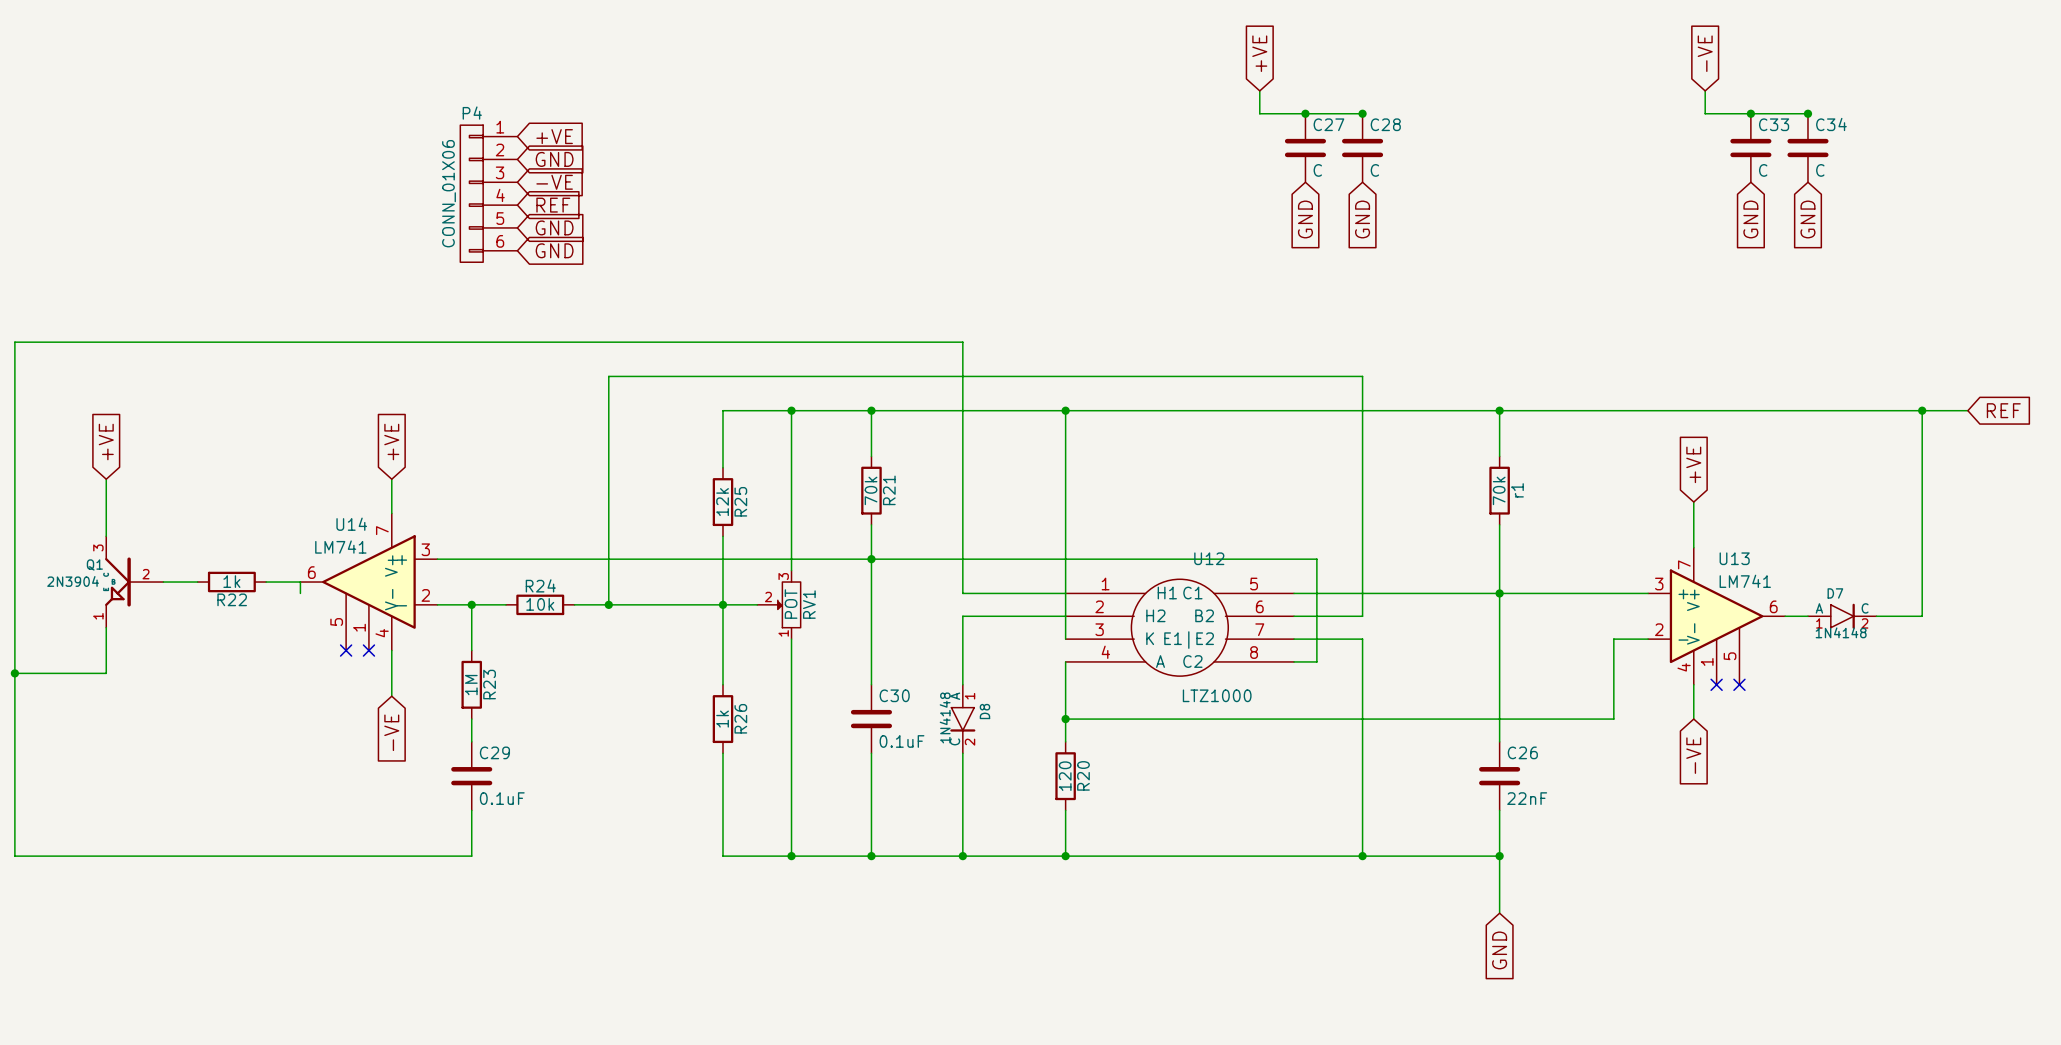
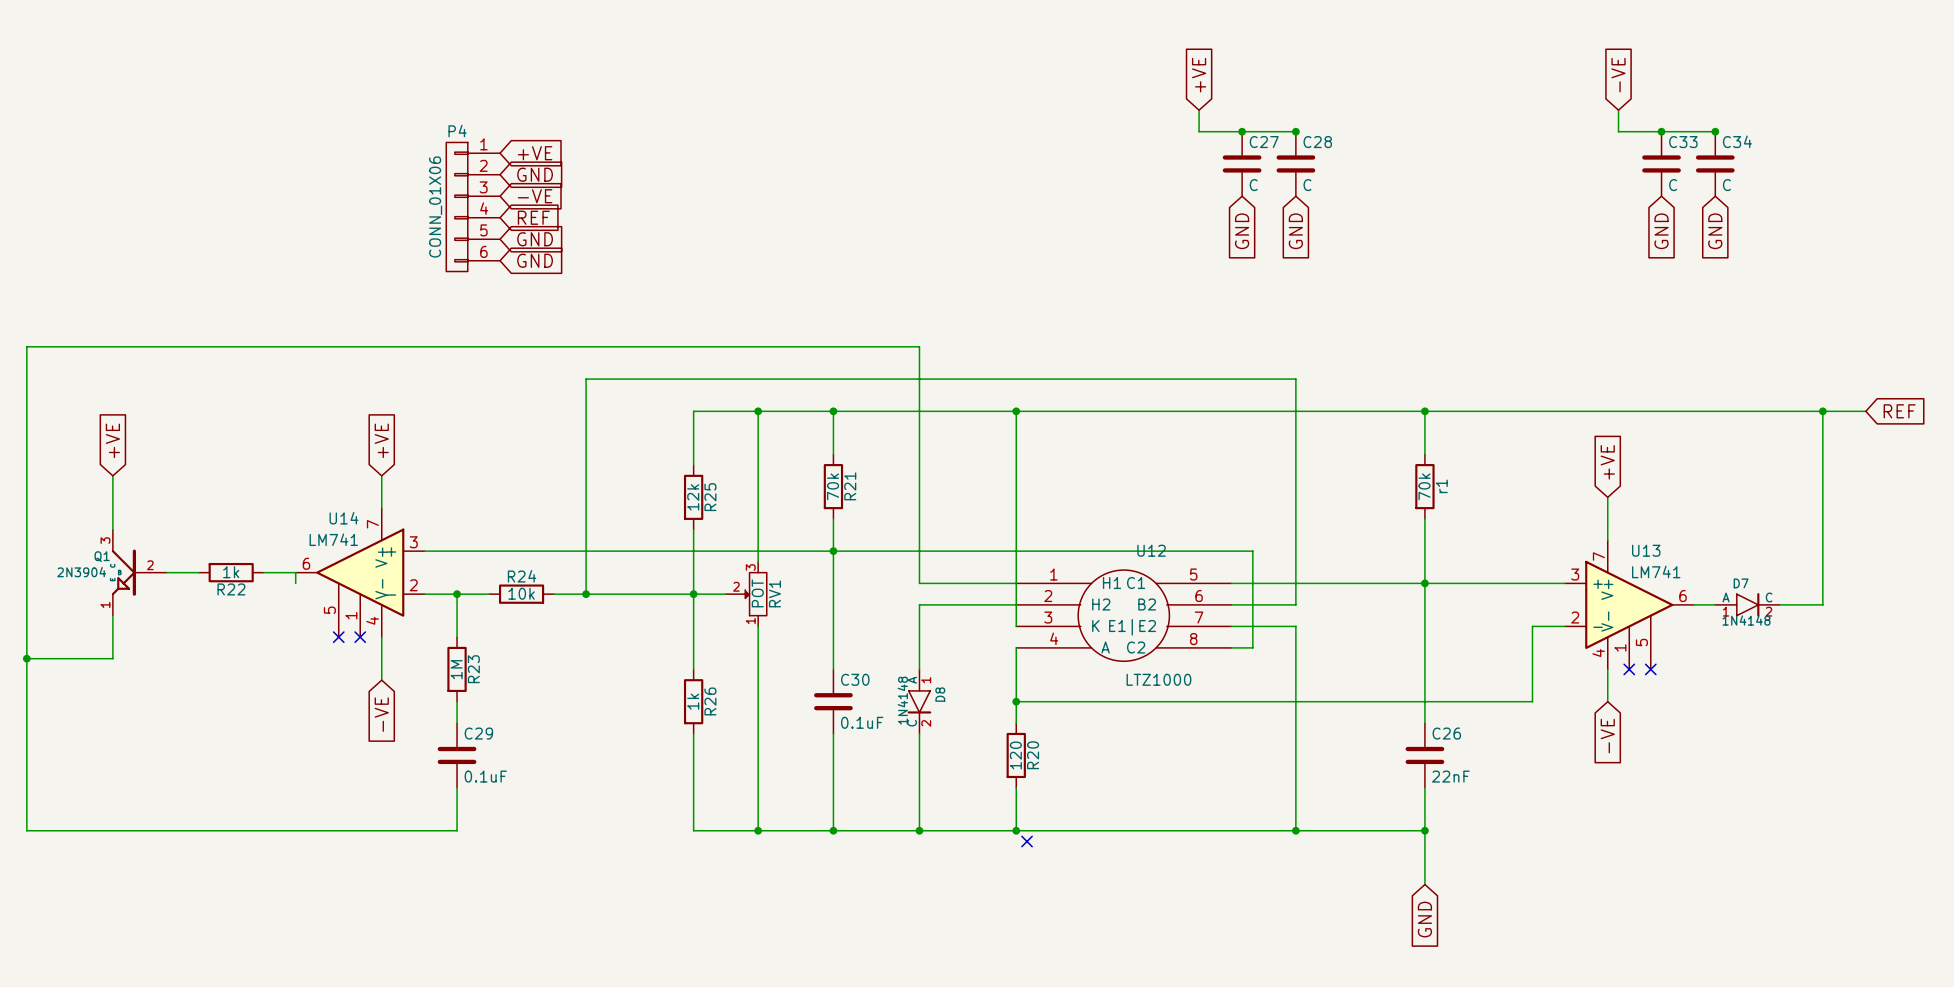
no-connect mark: none -> (1027, 841)

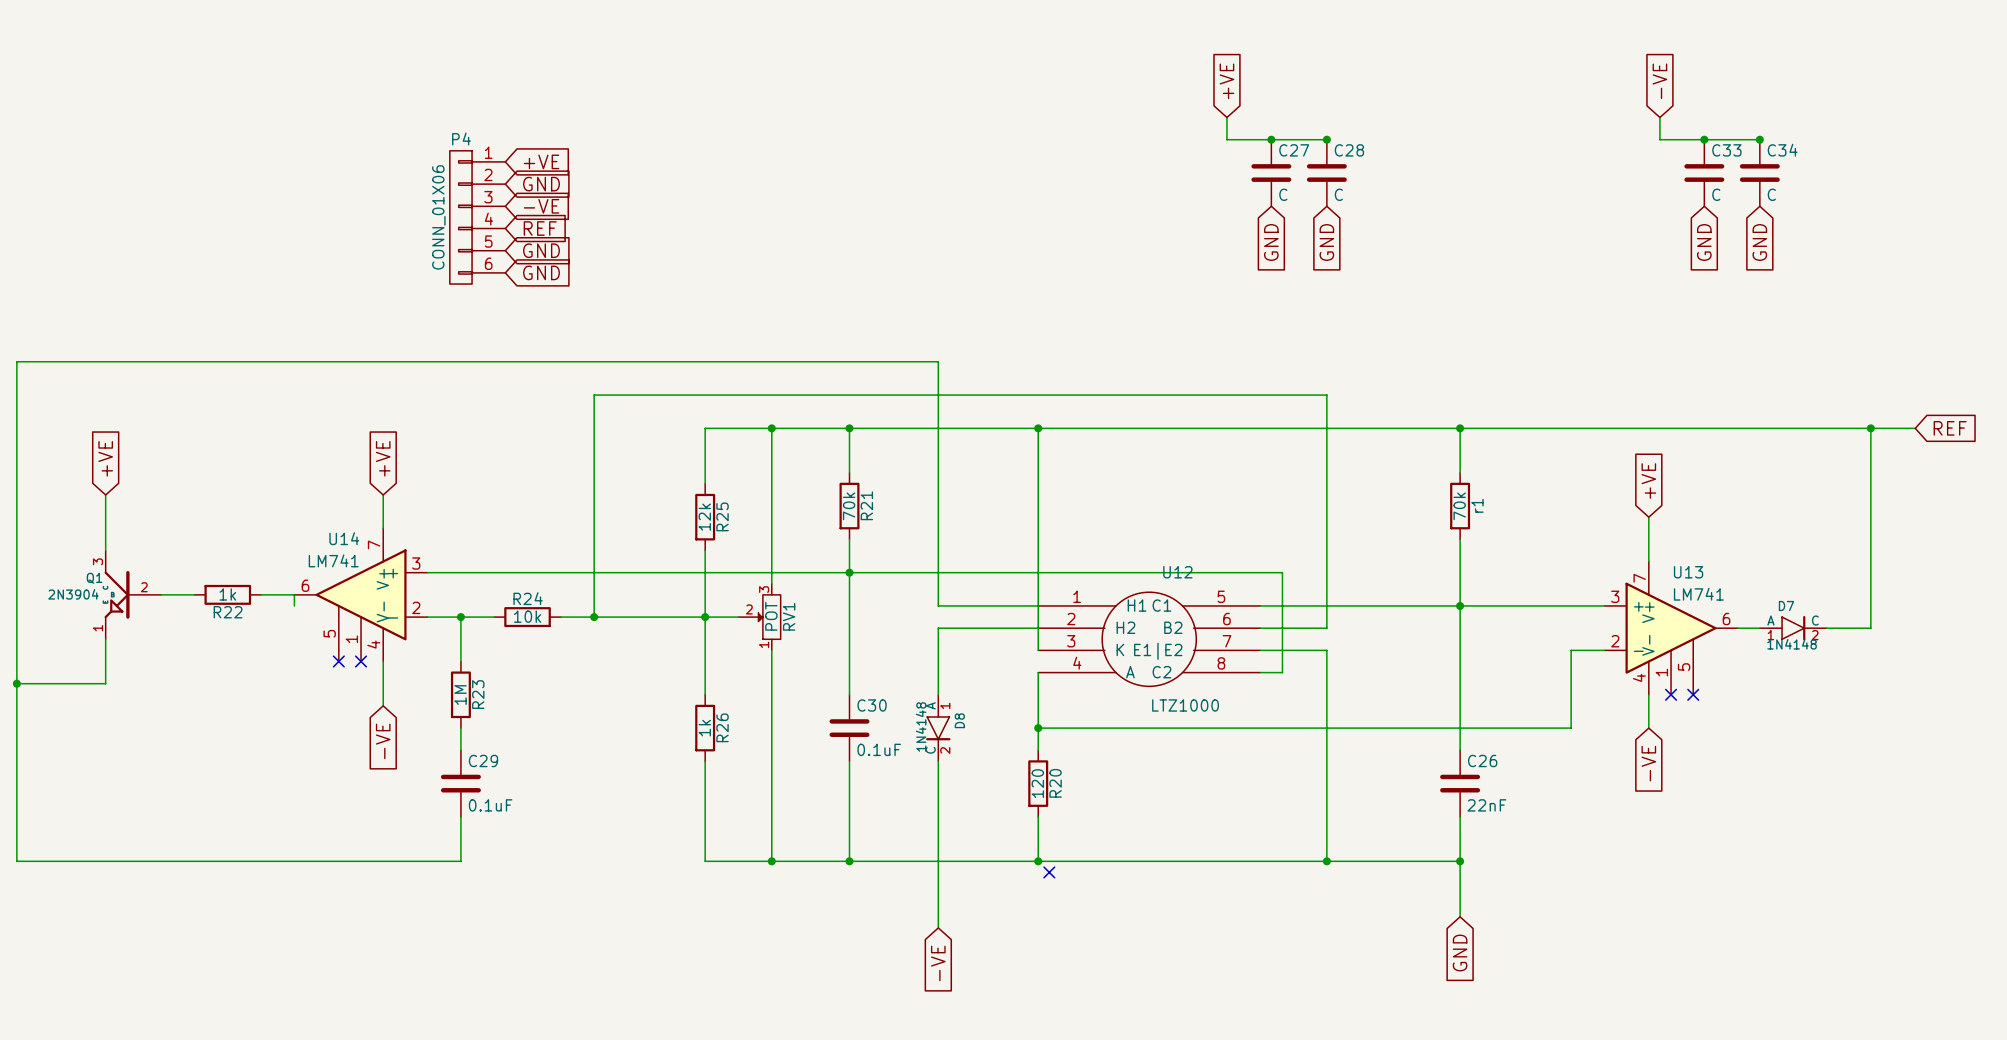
wire: none -> (938, 861) (938, 927)
junction: (919, 830) -> none
global label: none -> -VE (938, 963)

